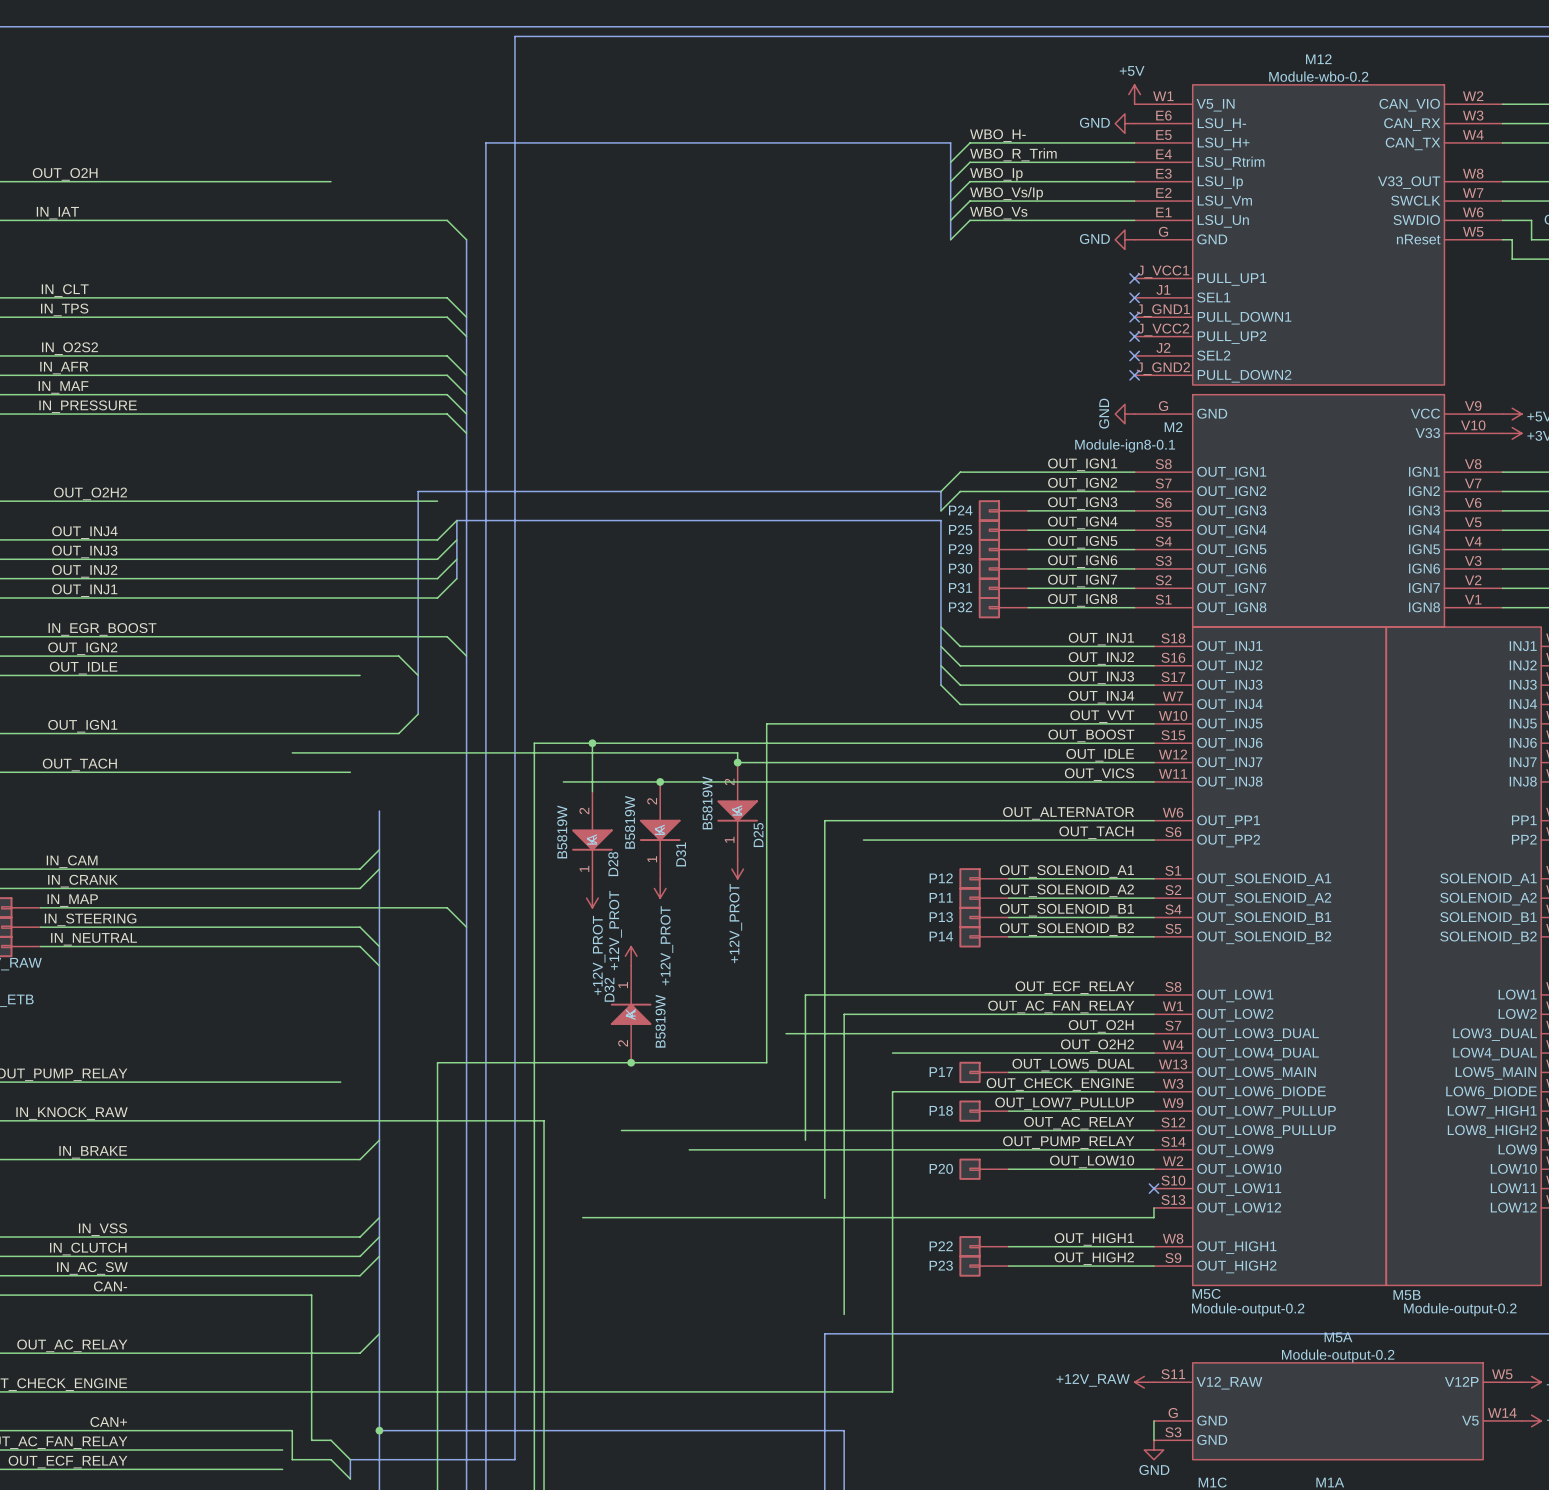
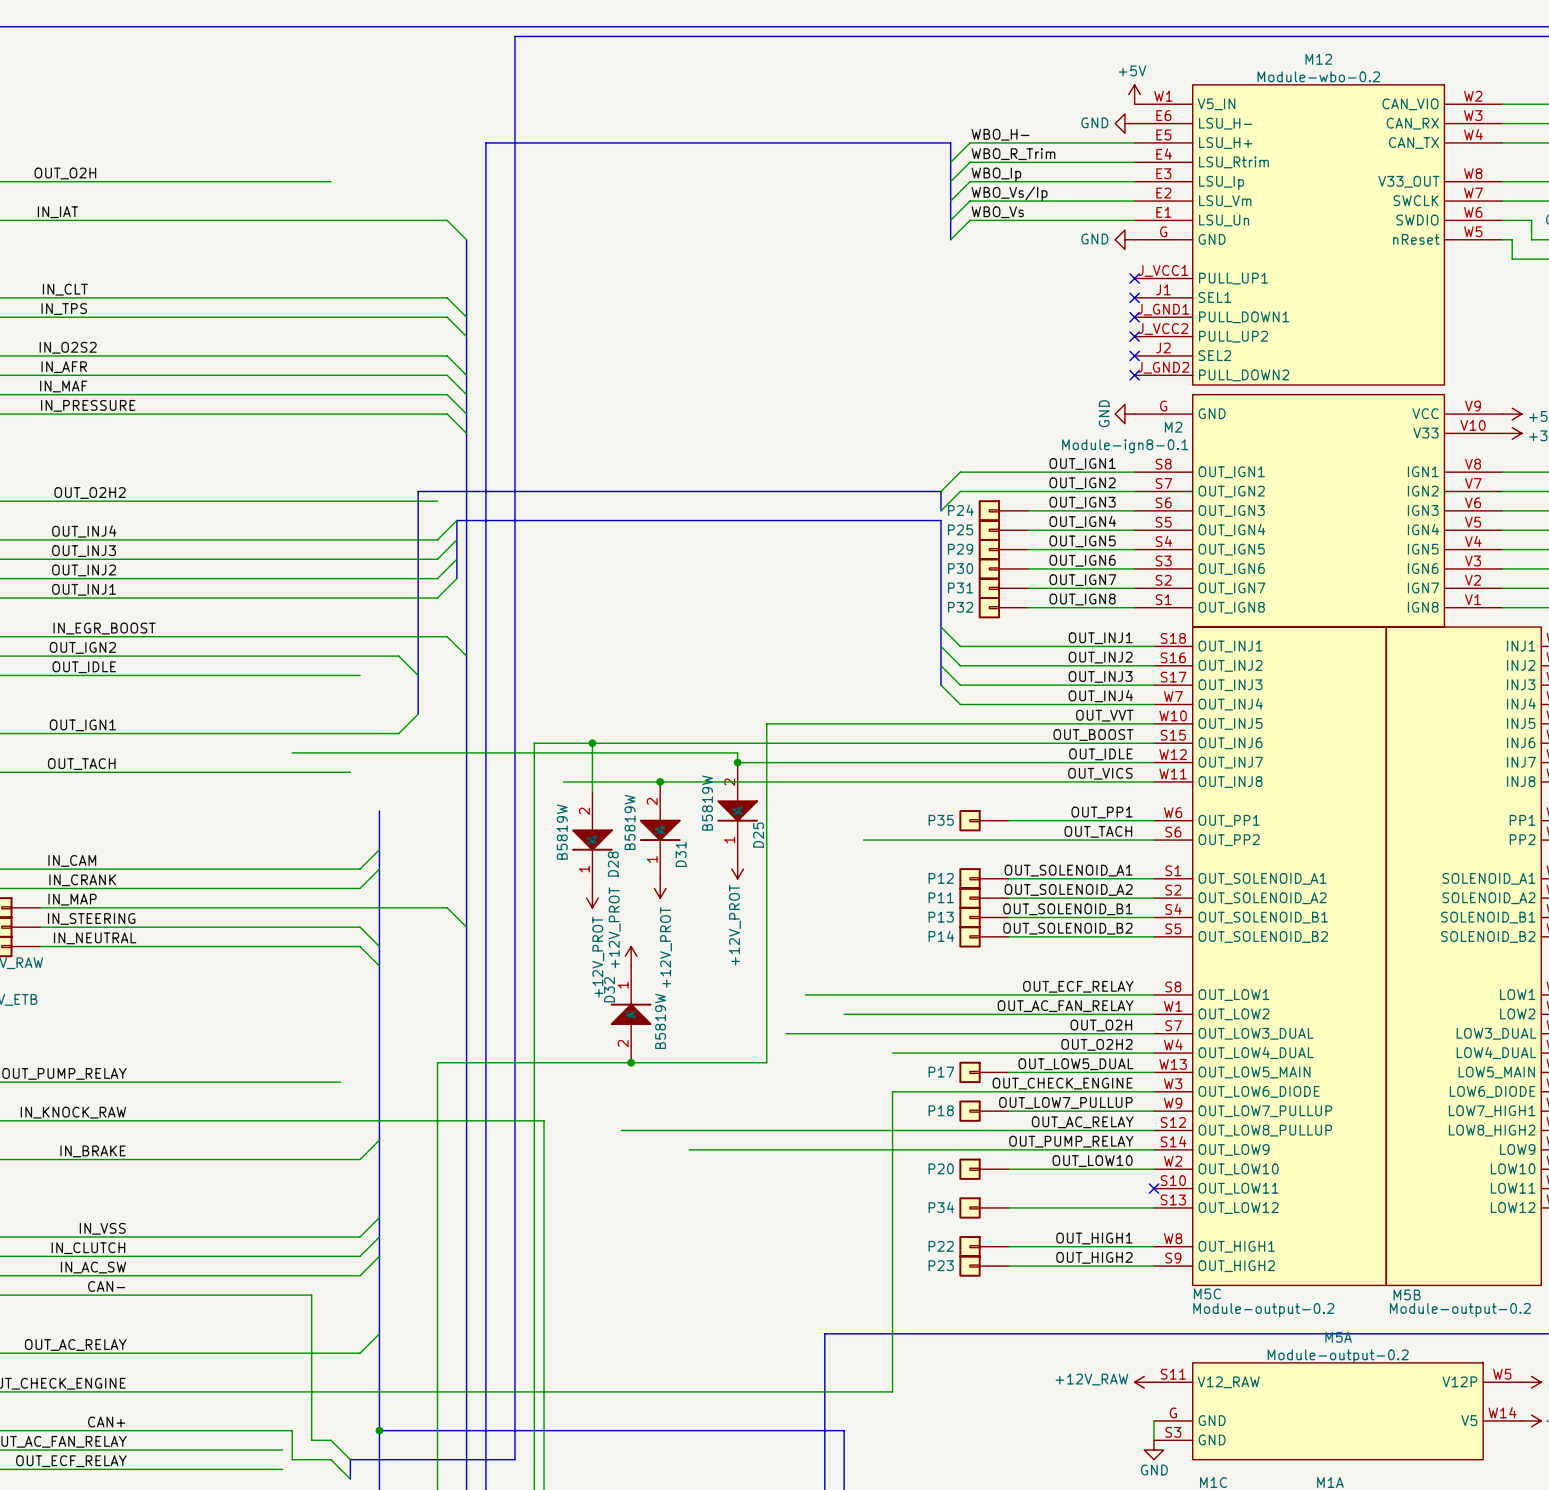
label: OUT_ALTERNATOR (1068, 813) -> OUT_PP1 (1102, 812)
P35: none -> (984, 820)
wire: (1008, 820) (824, 820) (824, 1198) -> none
wire: (805, 994) (805, 1140) -> none
wire: (844, 1014) (844, 1314) -> none
P34: none -> (984, 1207)
wire: (1153, 1207) (1153, 1217) (582, 1217) -> (1153, 1207) (1008, 1207)

